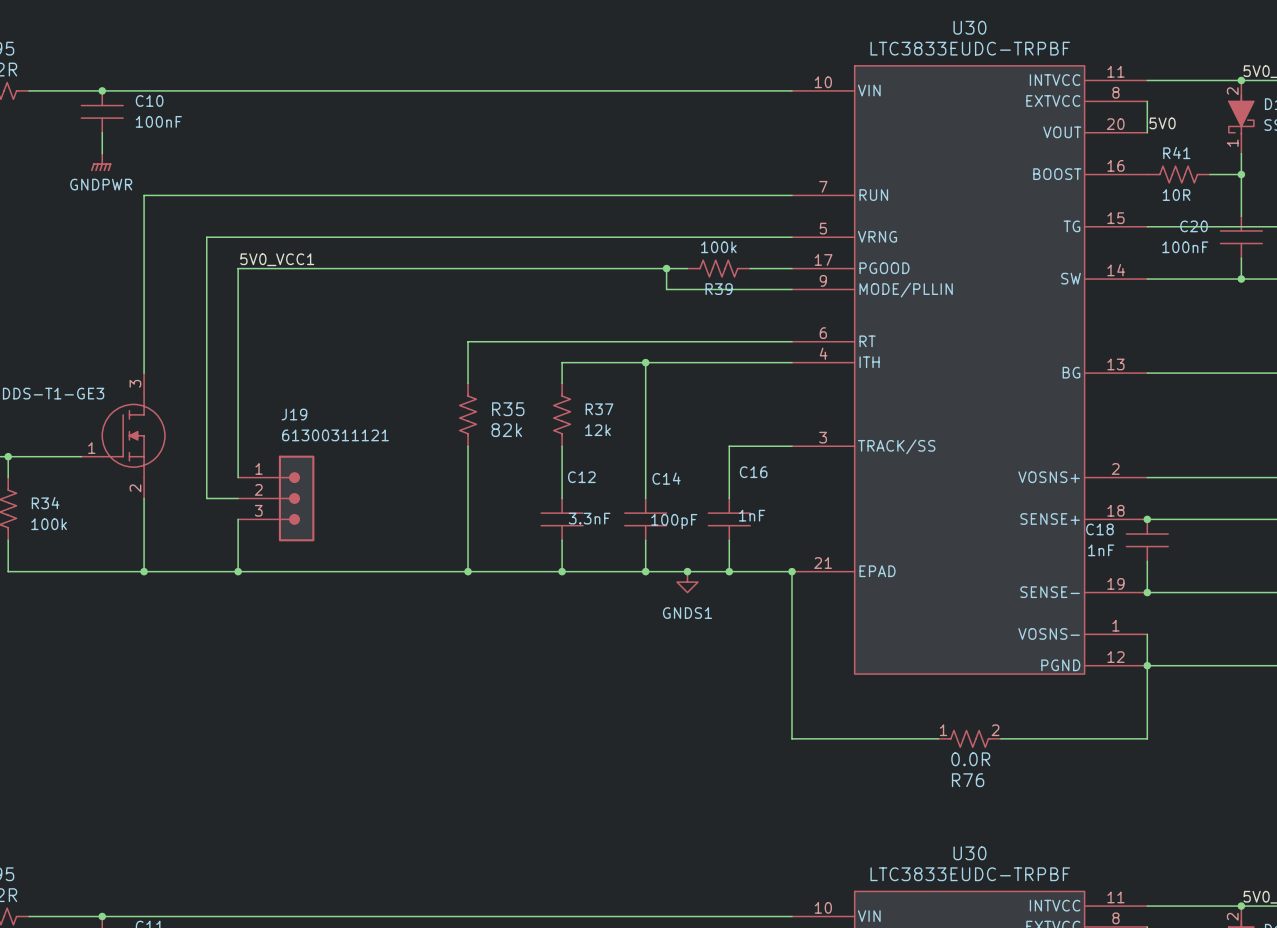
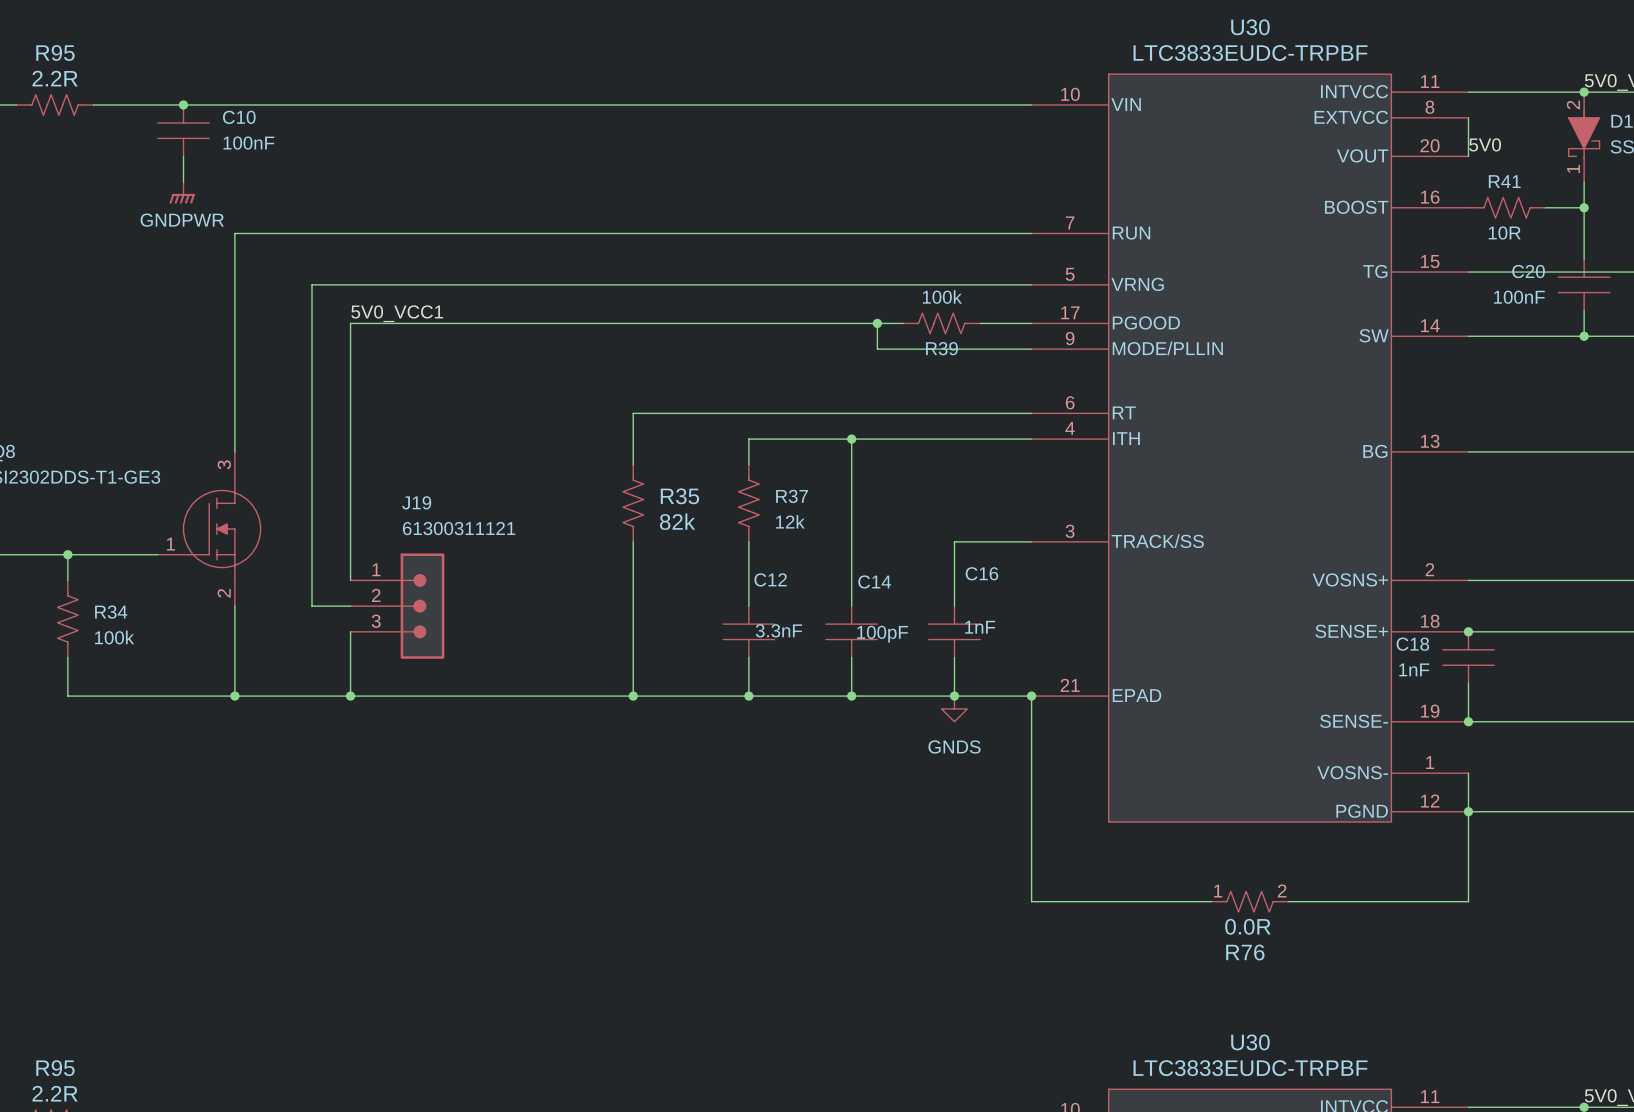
junction: (687, 571) -> none
power symbol: GNDS1 (687, 582) -> none
power symbol: none -> GNDS (954, 708)

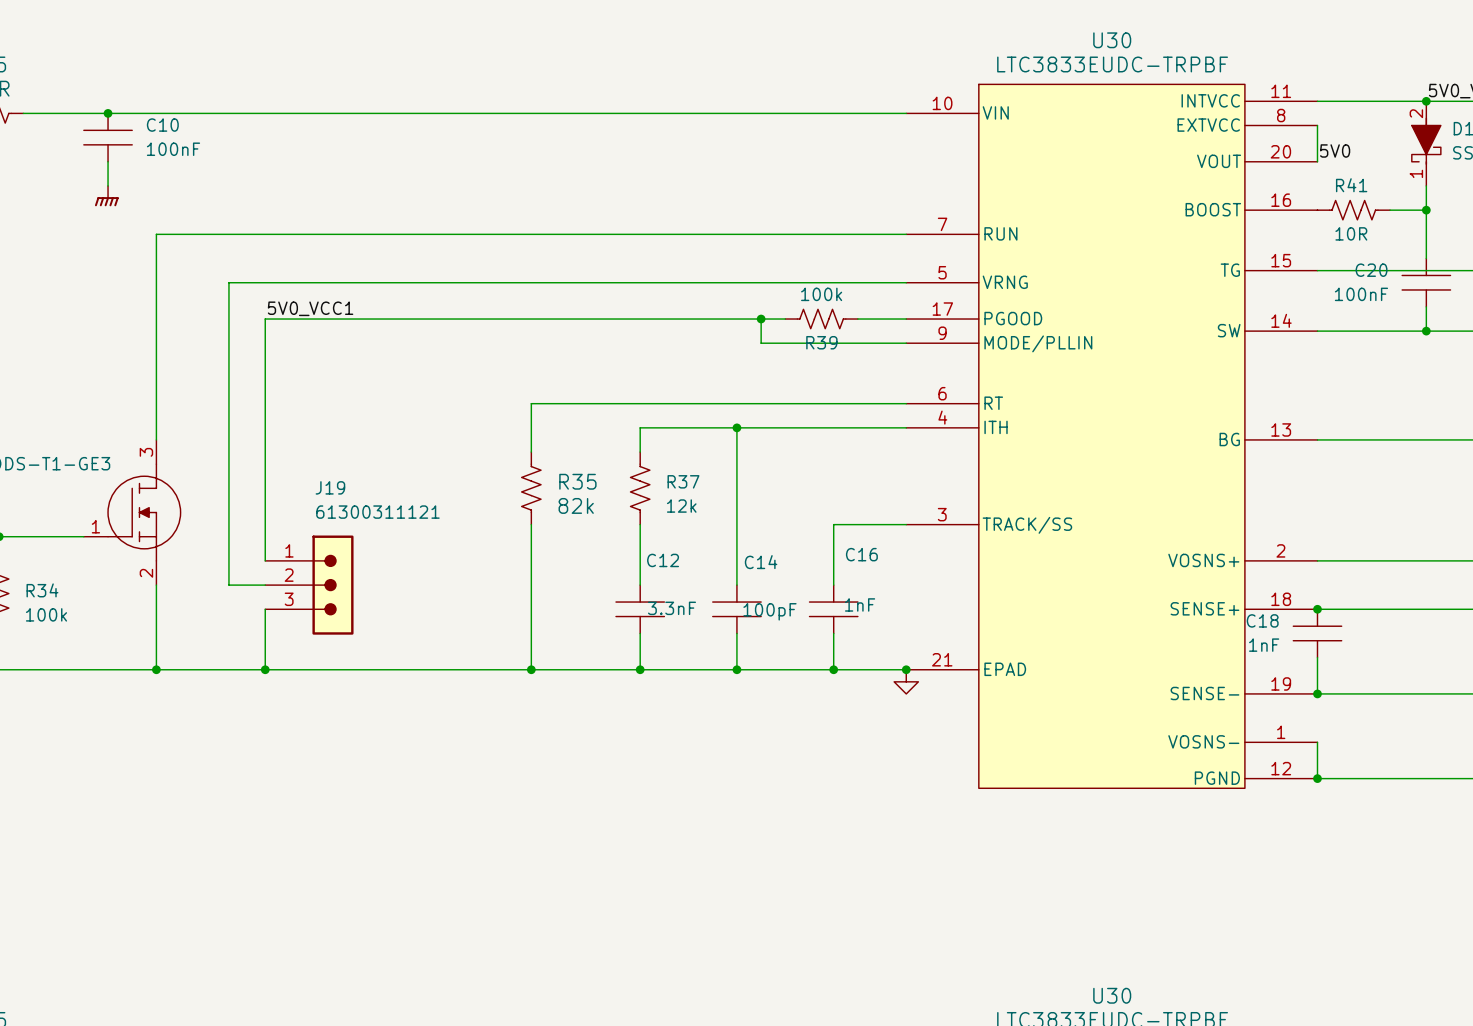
power symbol text: GNDPWR (182, 220) -> none
wire: (1031, 696) (1031, 901) (1211, 901) -> none
power symbol: GNDS (954, 708) -> none
power symbol: none -> (906, 681)
wire: (1468, 811) (1468, 901) (1288, 901) -> none
R76: 0.0R (1250, 901) -> none

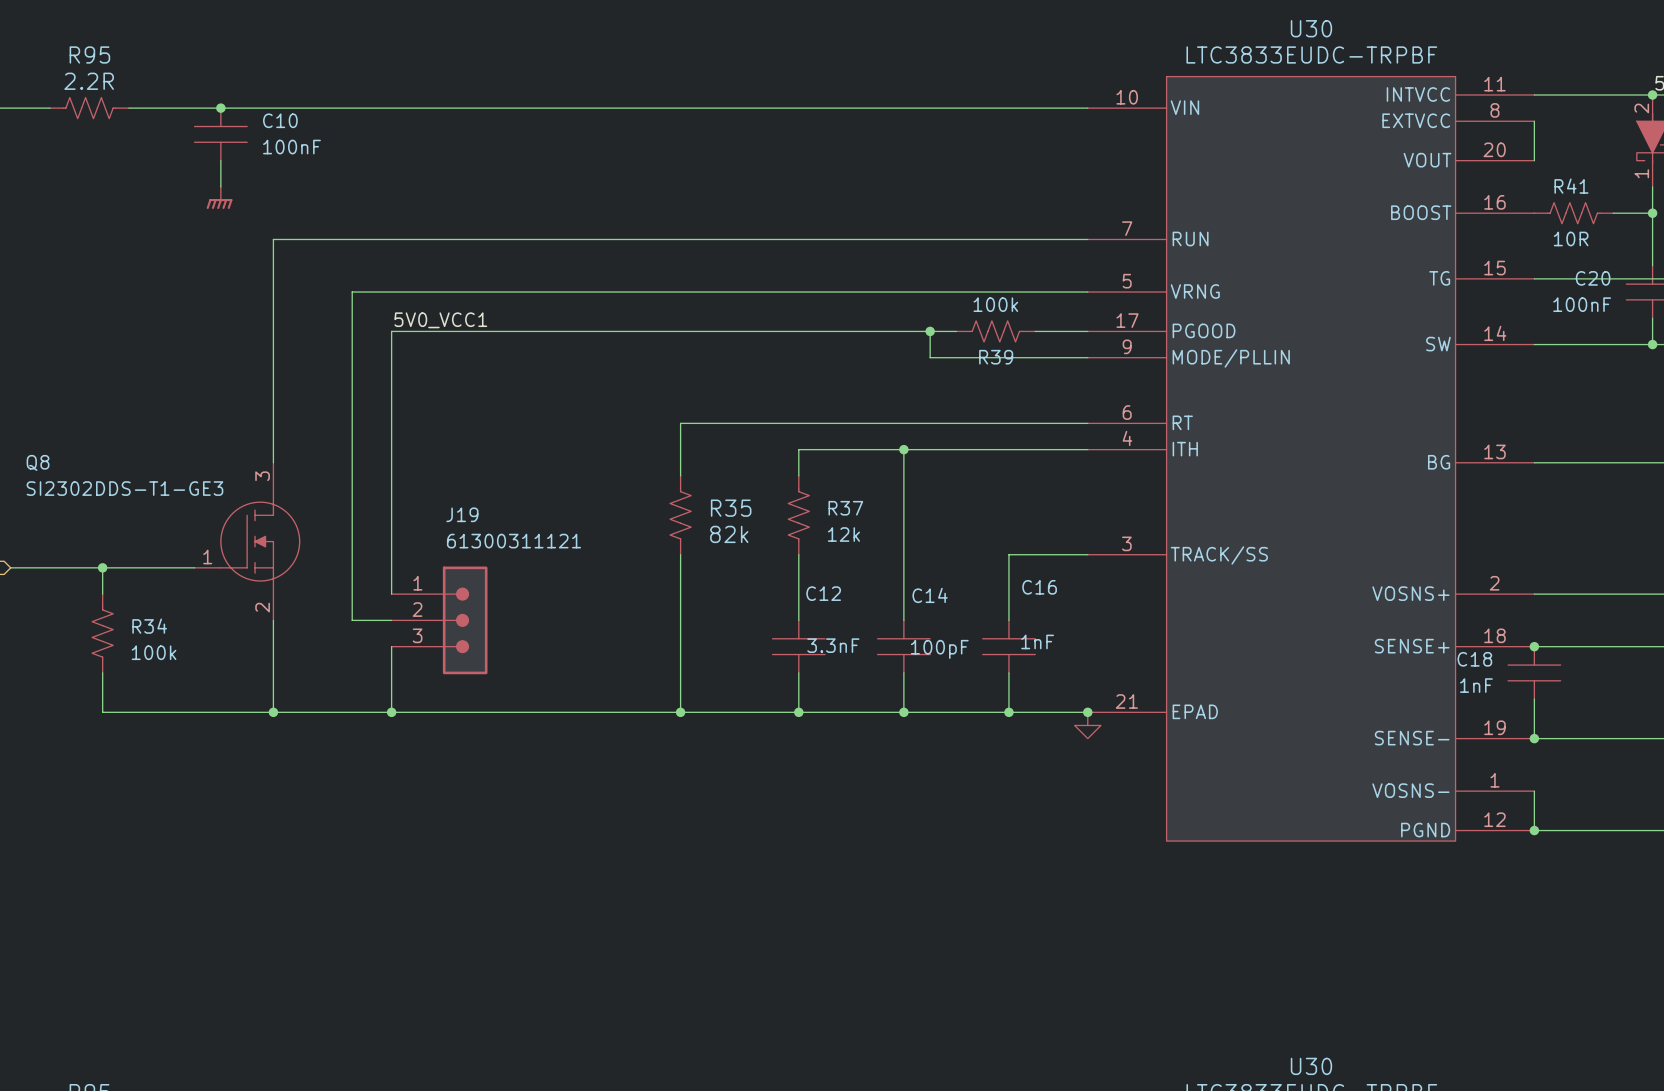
label: 5V0 (1335, 150) -> none

